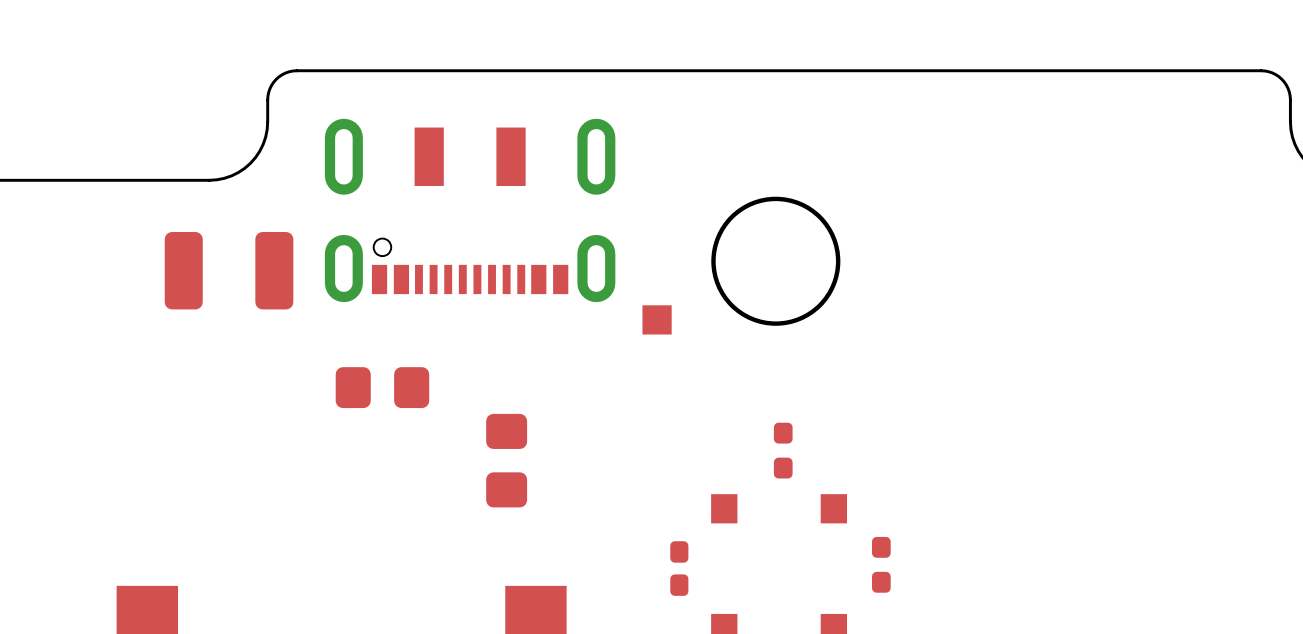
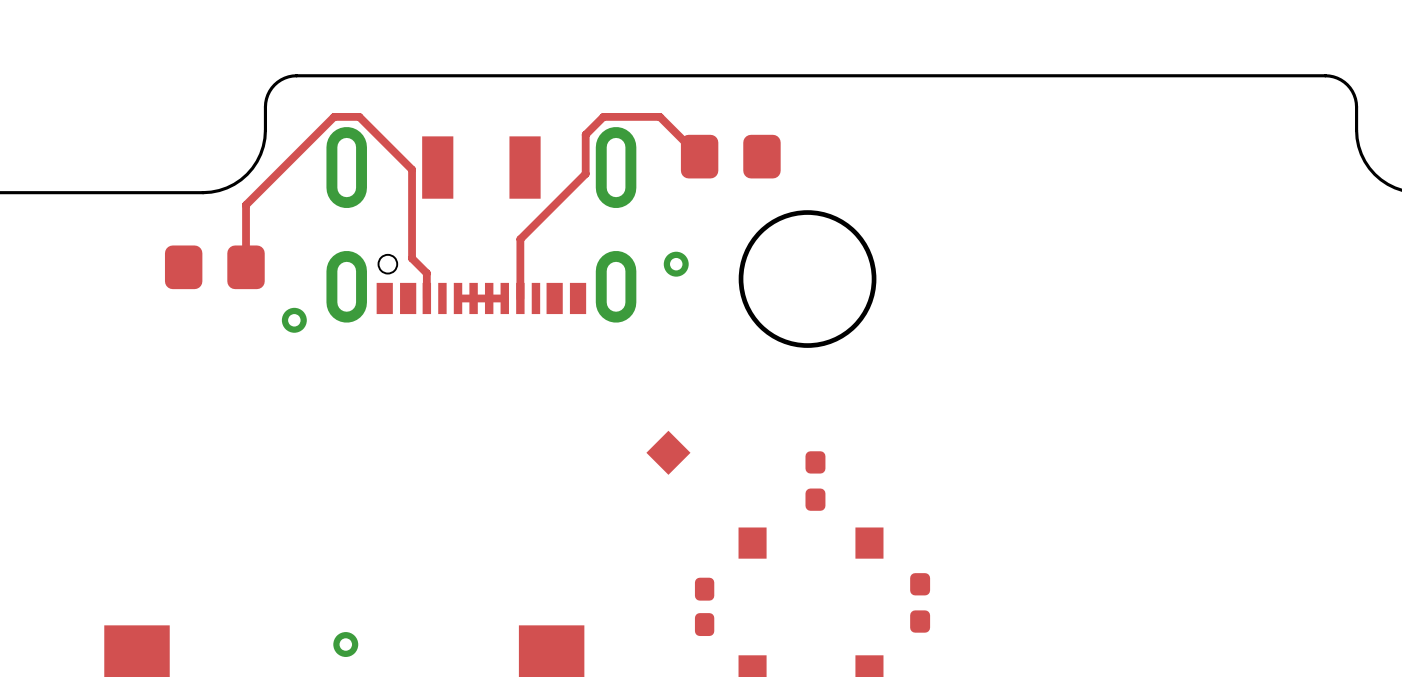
top track: none -> (699, 156) (659, 116) (603, 116) (585, 134) (585, 173) (520, 239) (520, 298)
part: none -> (730, 156)
part footprint: [164, 232, 294, 310] -> [164, 245, 265, 290]
via: none -> (676, 264)
top track: none -> (246, 267) (246, 205) (334, 116) (359, 116) (412, 169) (412, 258) (426, 273) (426, 298)
top track: none -> (504, 298) (458, 298)
via: none -> (294, 320)
part: (657, 319) -> none
part: (382, 387) -> none
part: none -> (668, 452)
part: (506, 460) -> none
via: none -> (345, 644)

